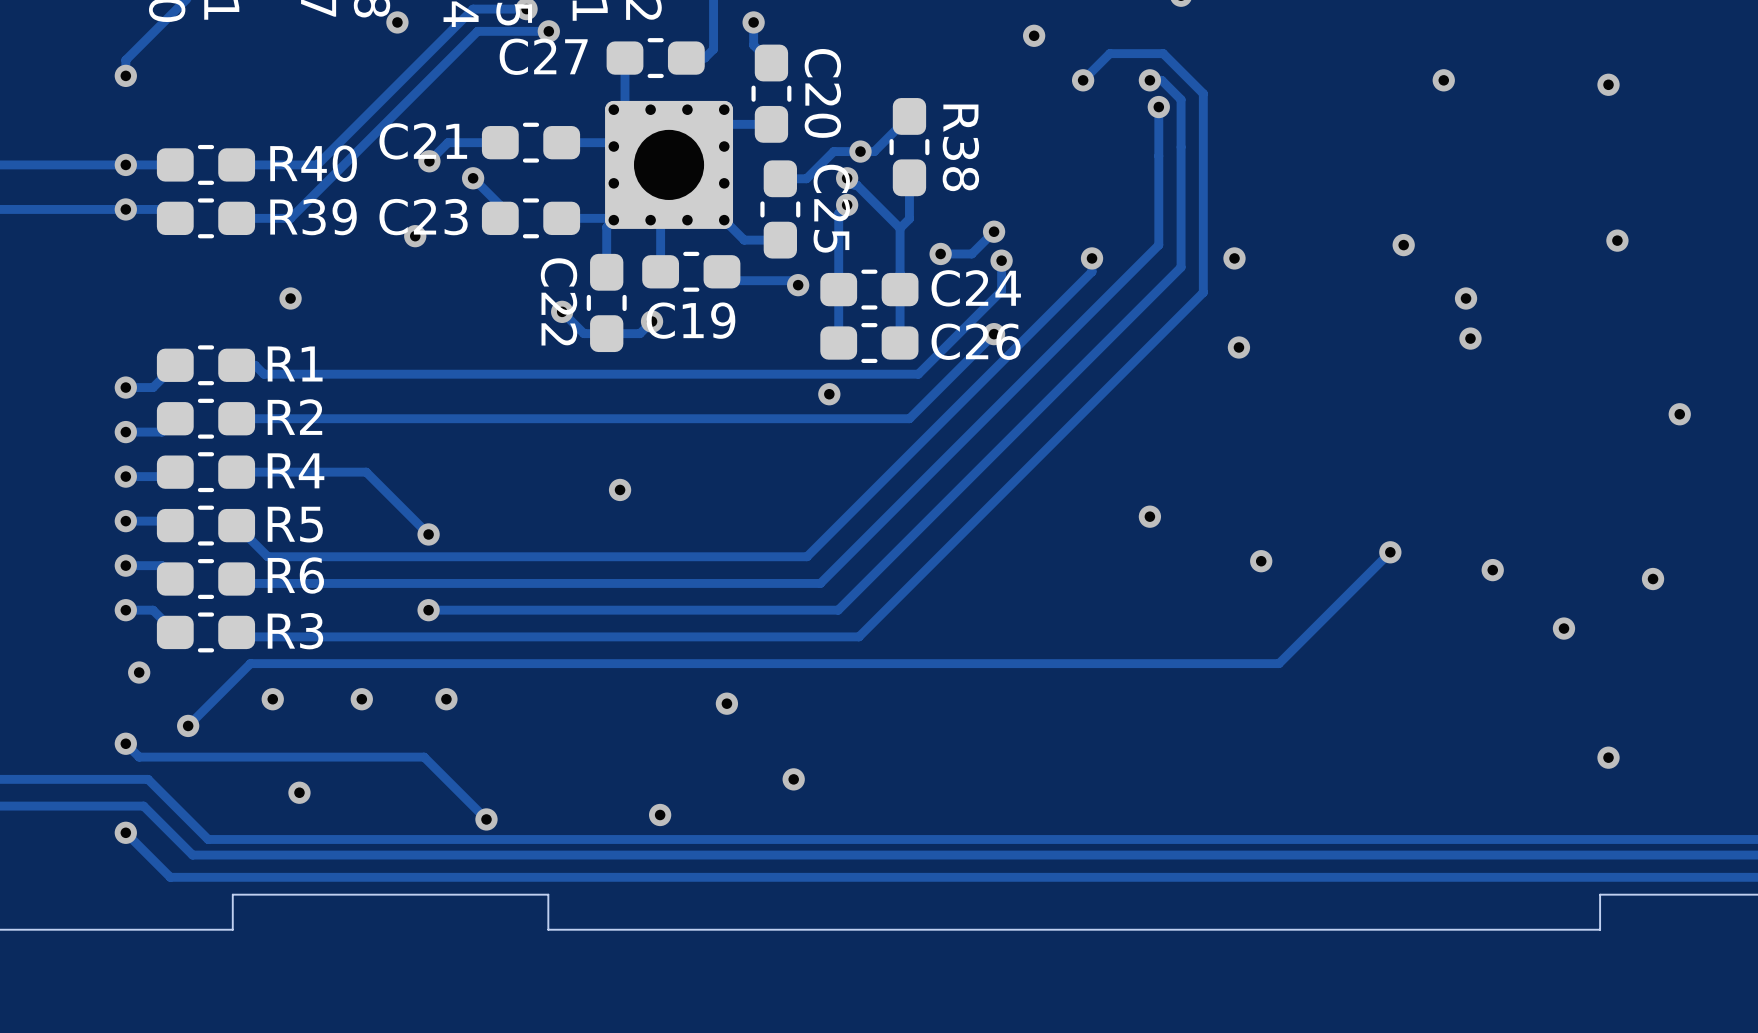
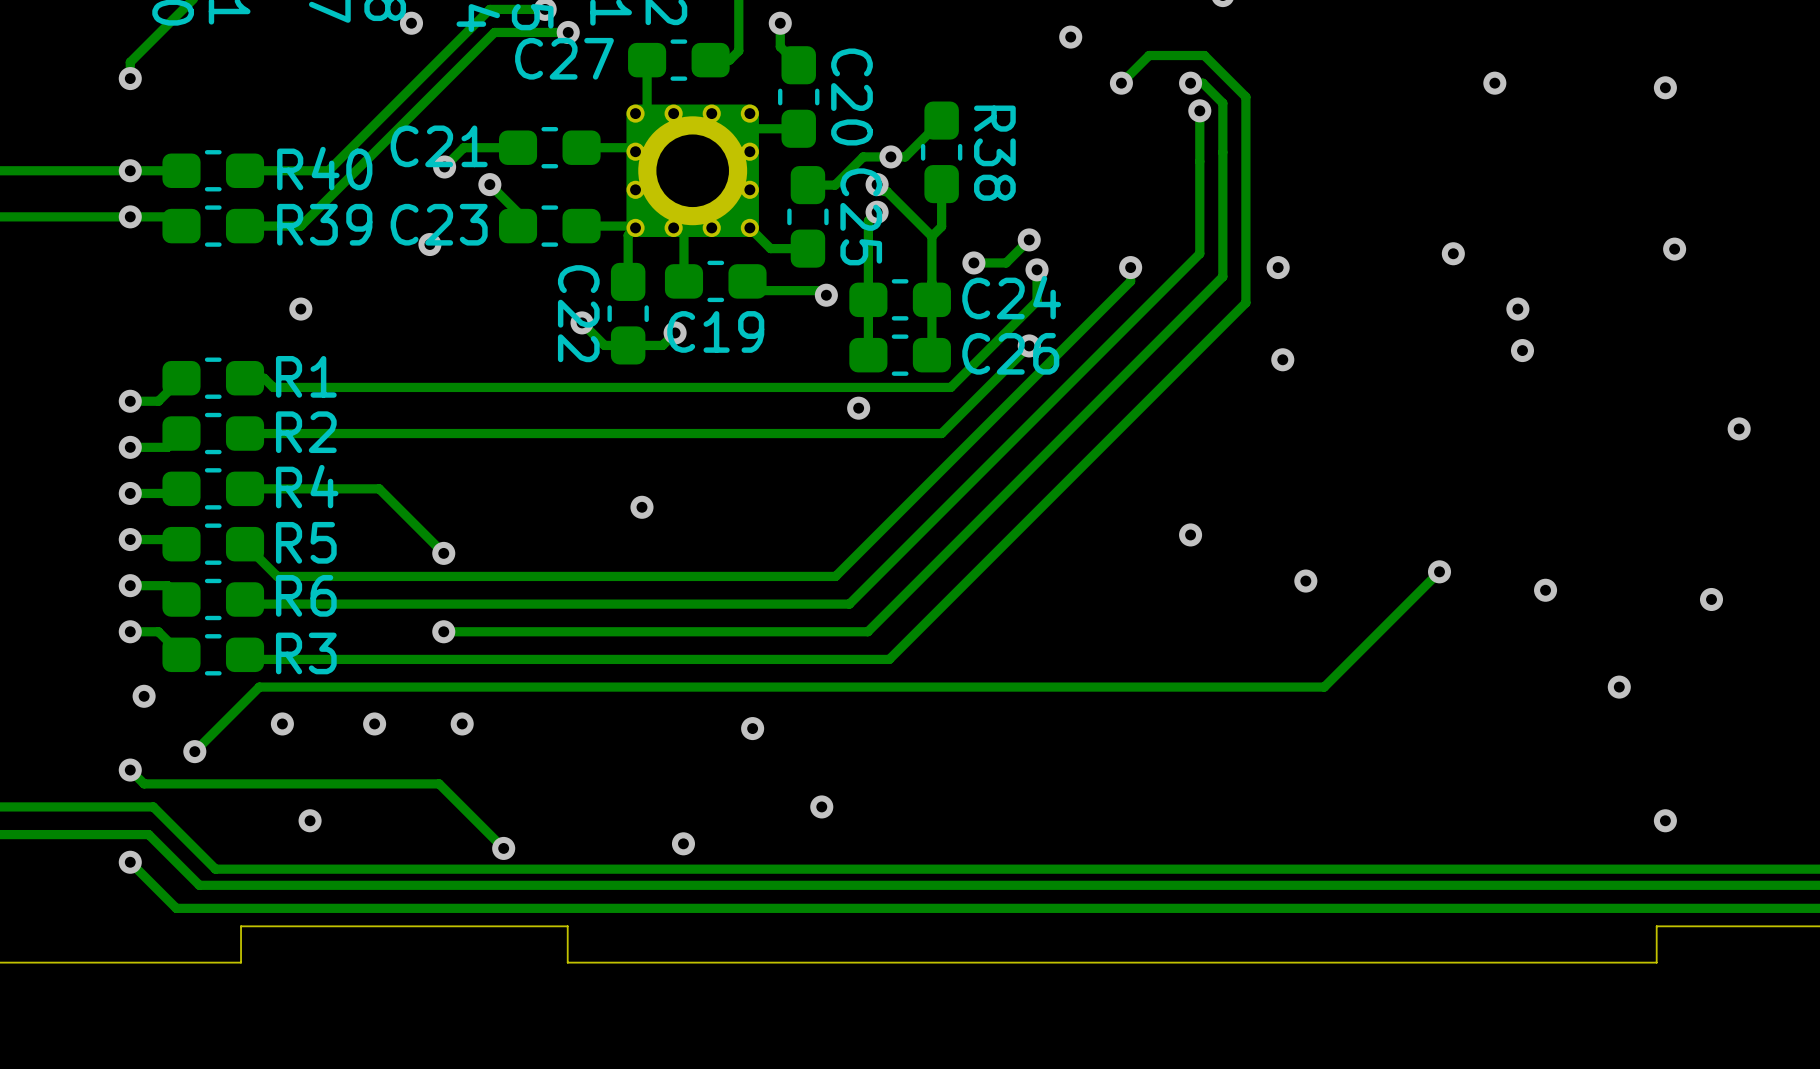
via position: (1563, 628) -> (1619, 687)
via position: (1608, 757) -> (1665, 820)

